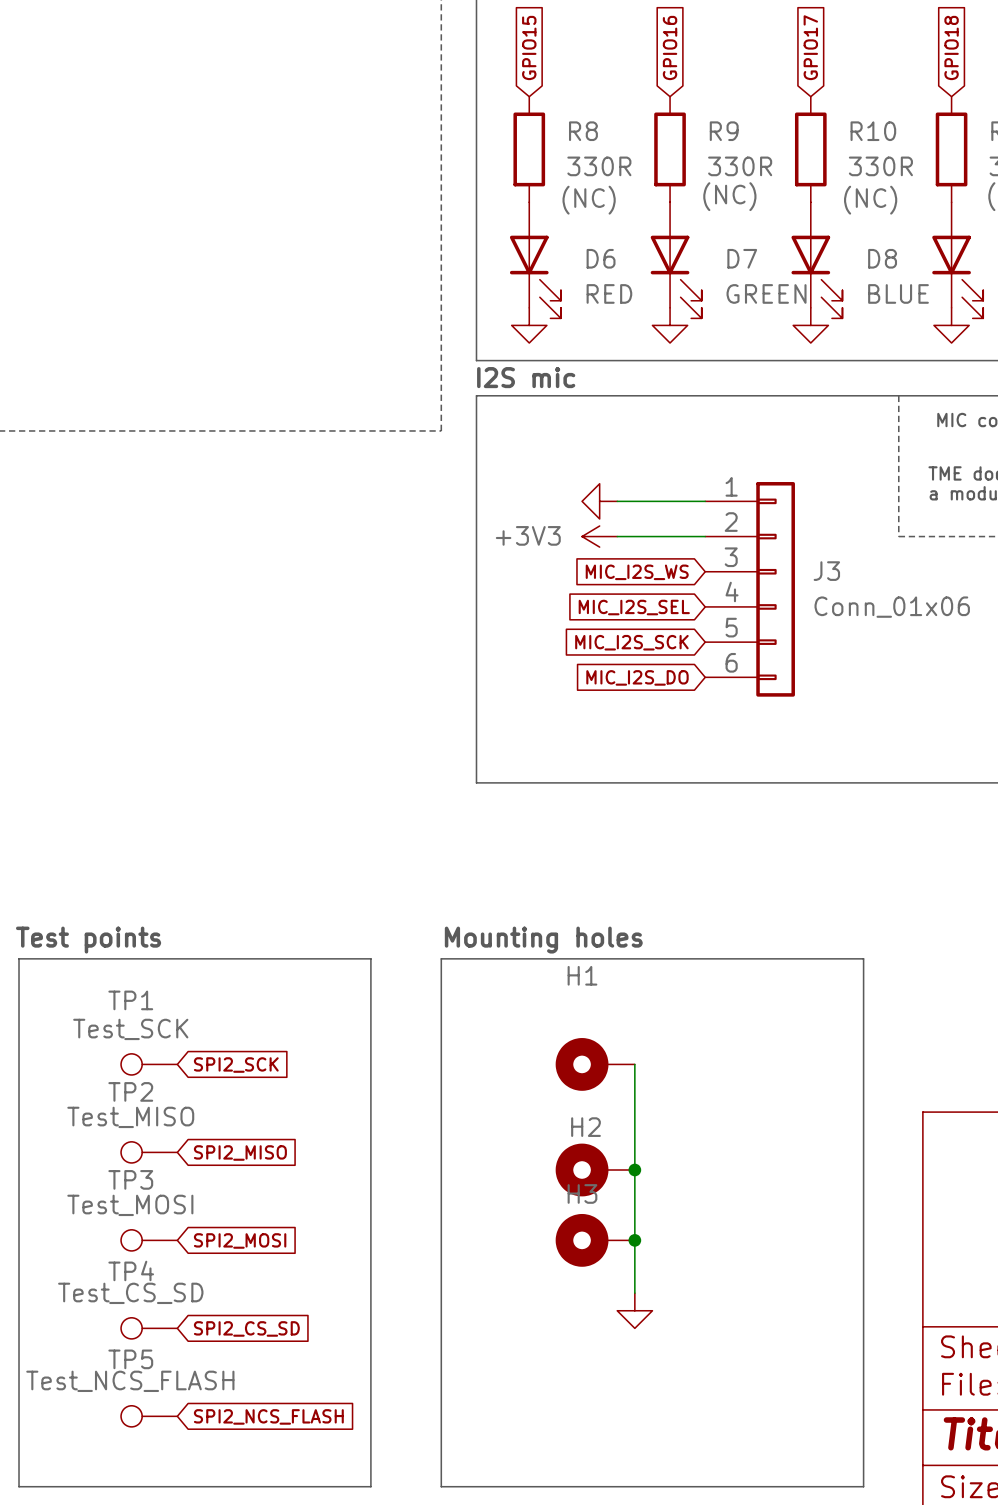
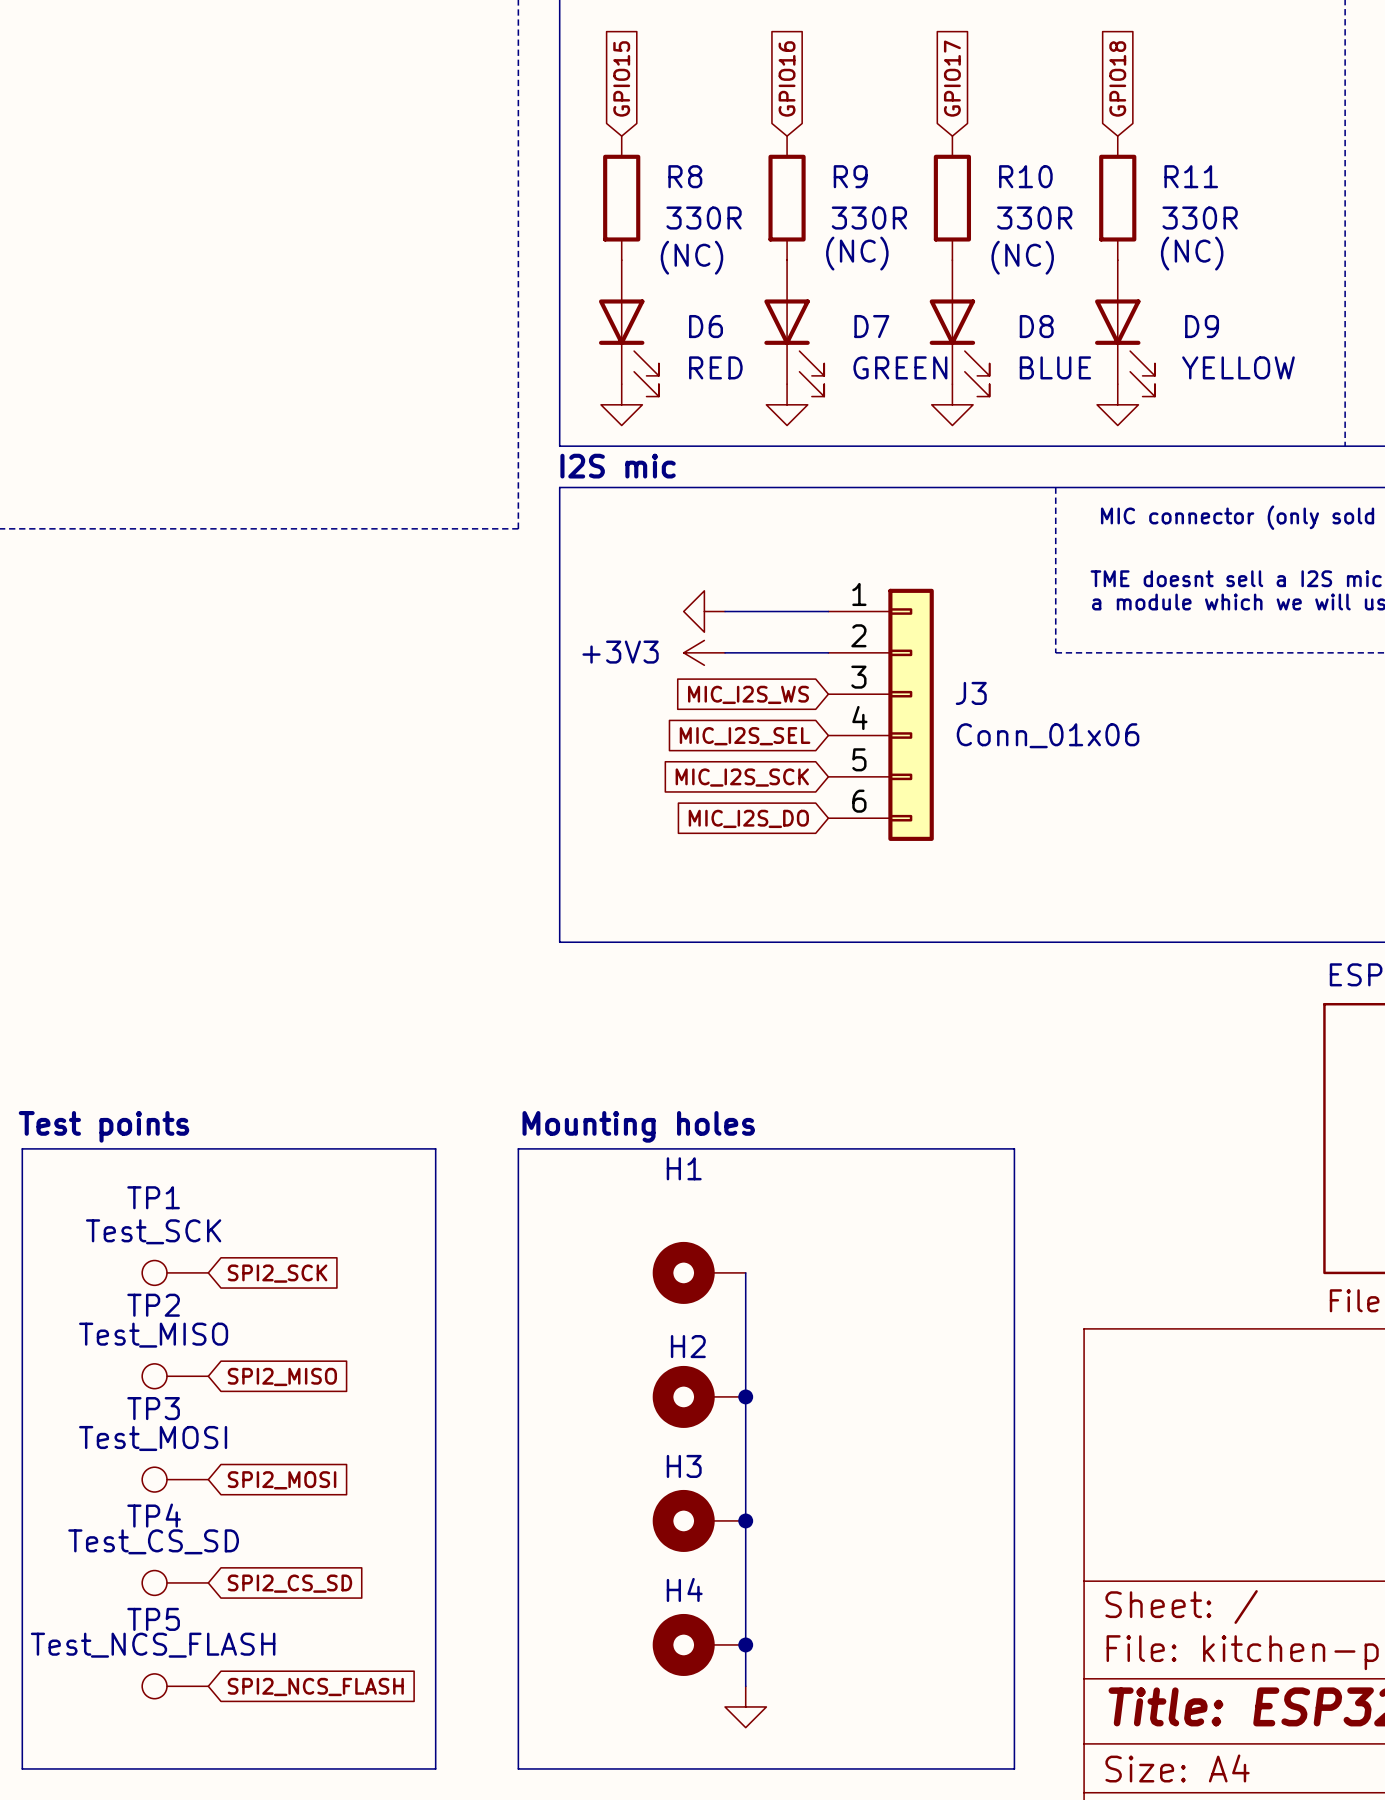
H3 position: (595, 1240) -> (699, 1520)
junction position: (634, 1240) -> (745, 1520)
wire: none -> (745, 1541) (745, 1686)
power symbol position: (634, 1310) -> (745, 1706)
H4: none -> (699, 1644)
junction: none -> (745, 1644)

